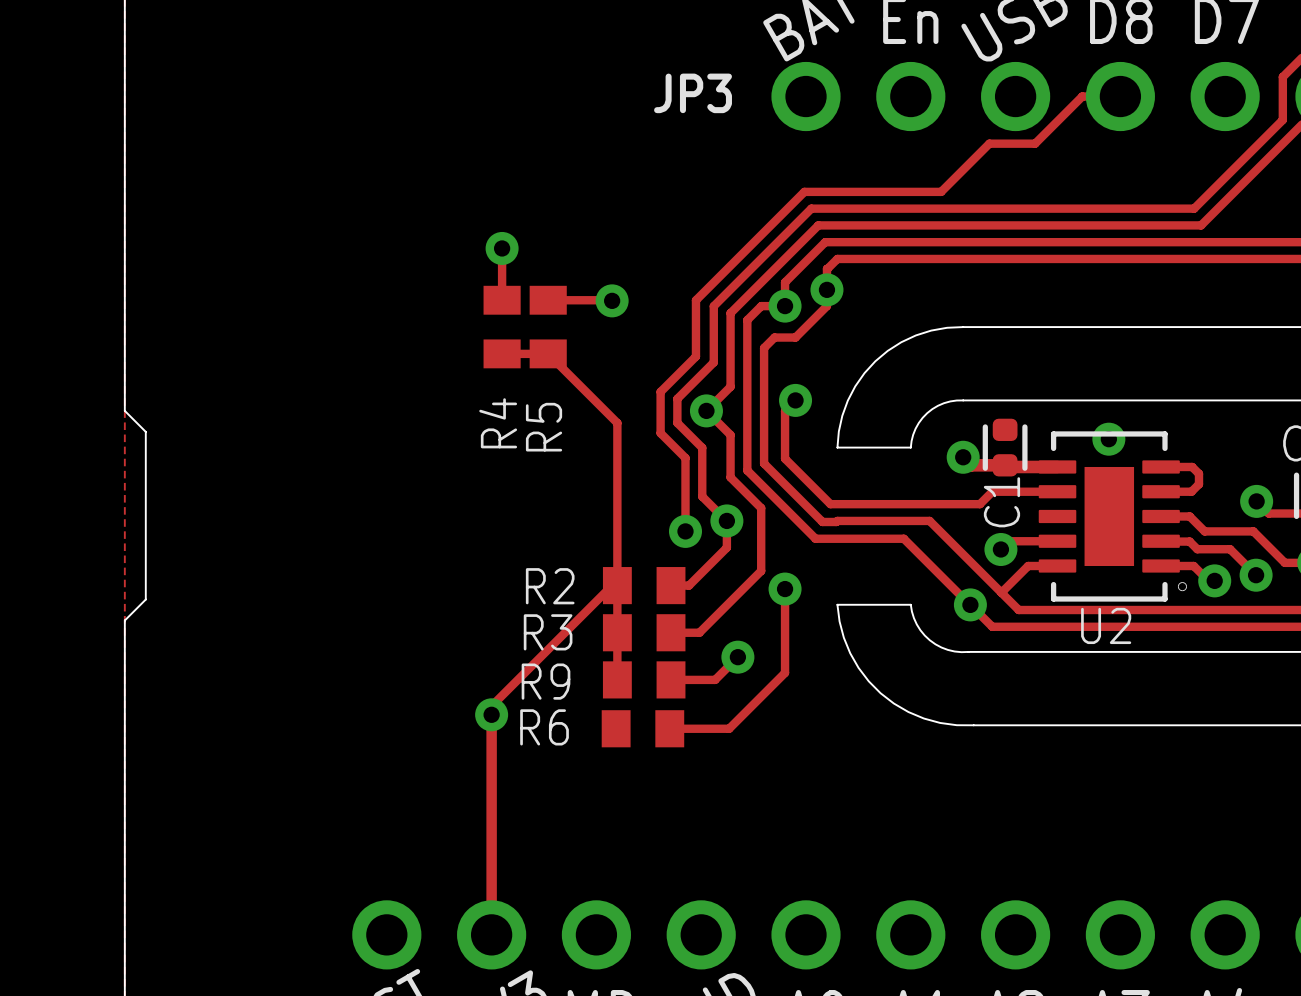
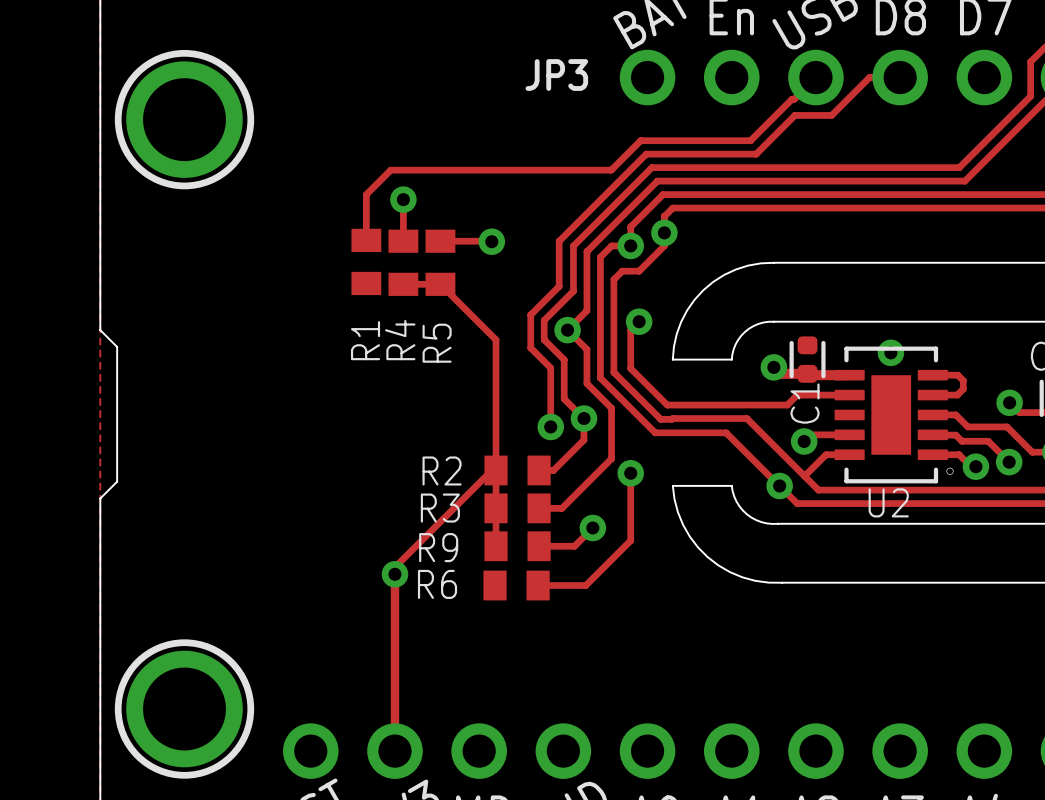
track: none -> (815, 77) (750, 140) (640, 140) (611, 170) (390, 170) (366, 194) (366, 240)
part: none -> (184, 119)
R1: none -> (366, 261)
part: none -> (184, 709)

